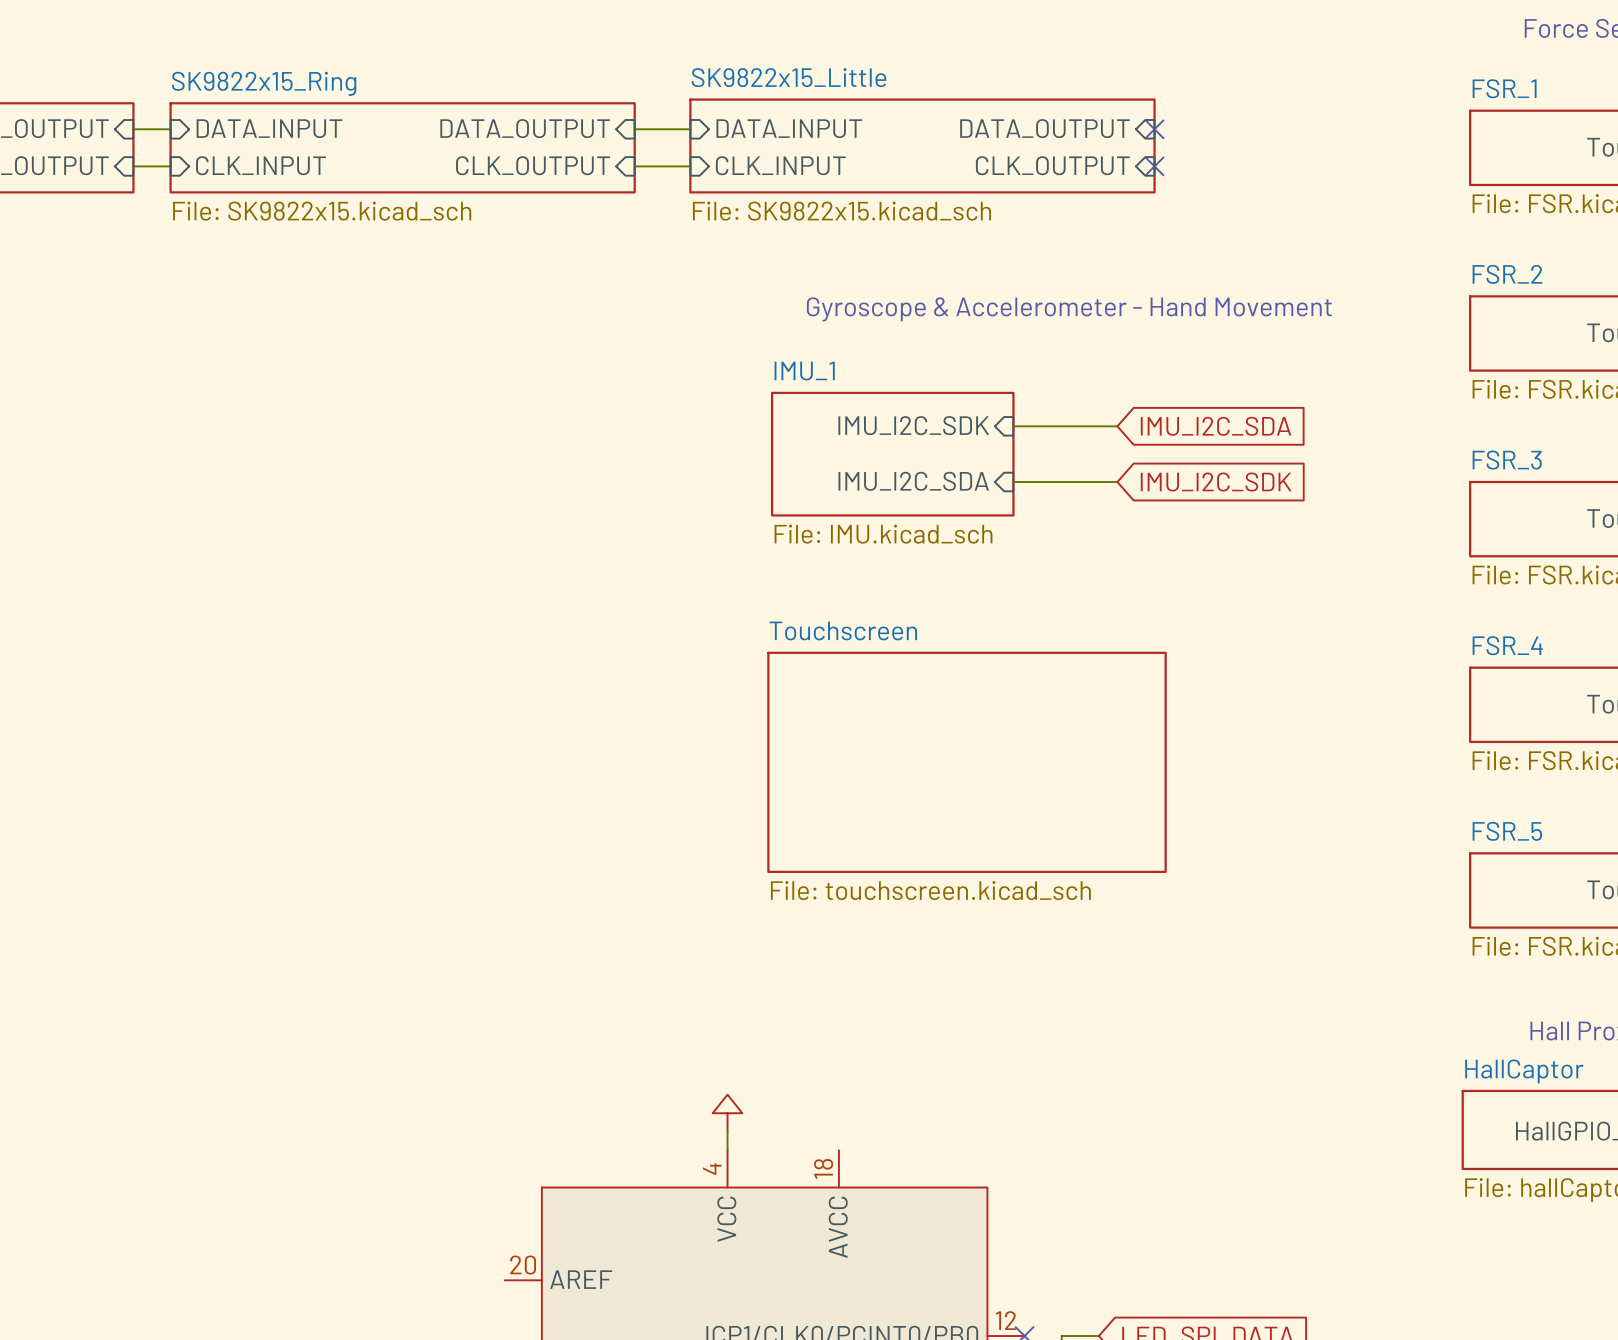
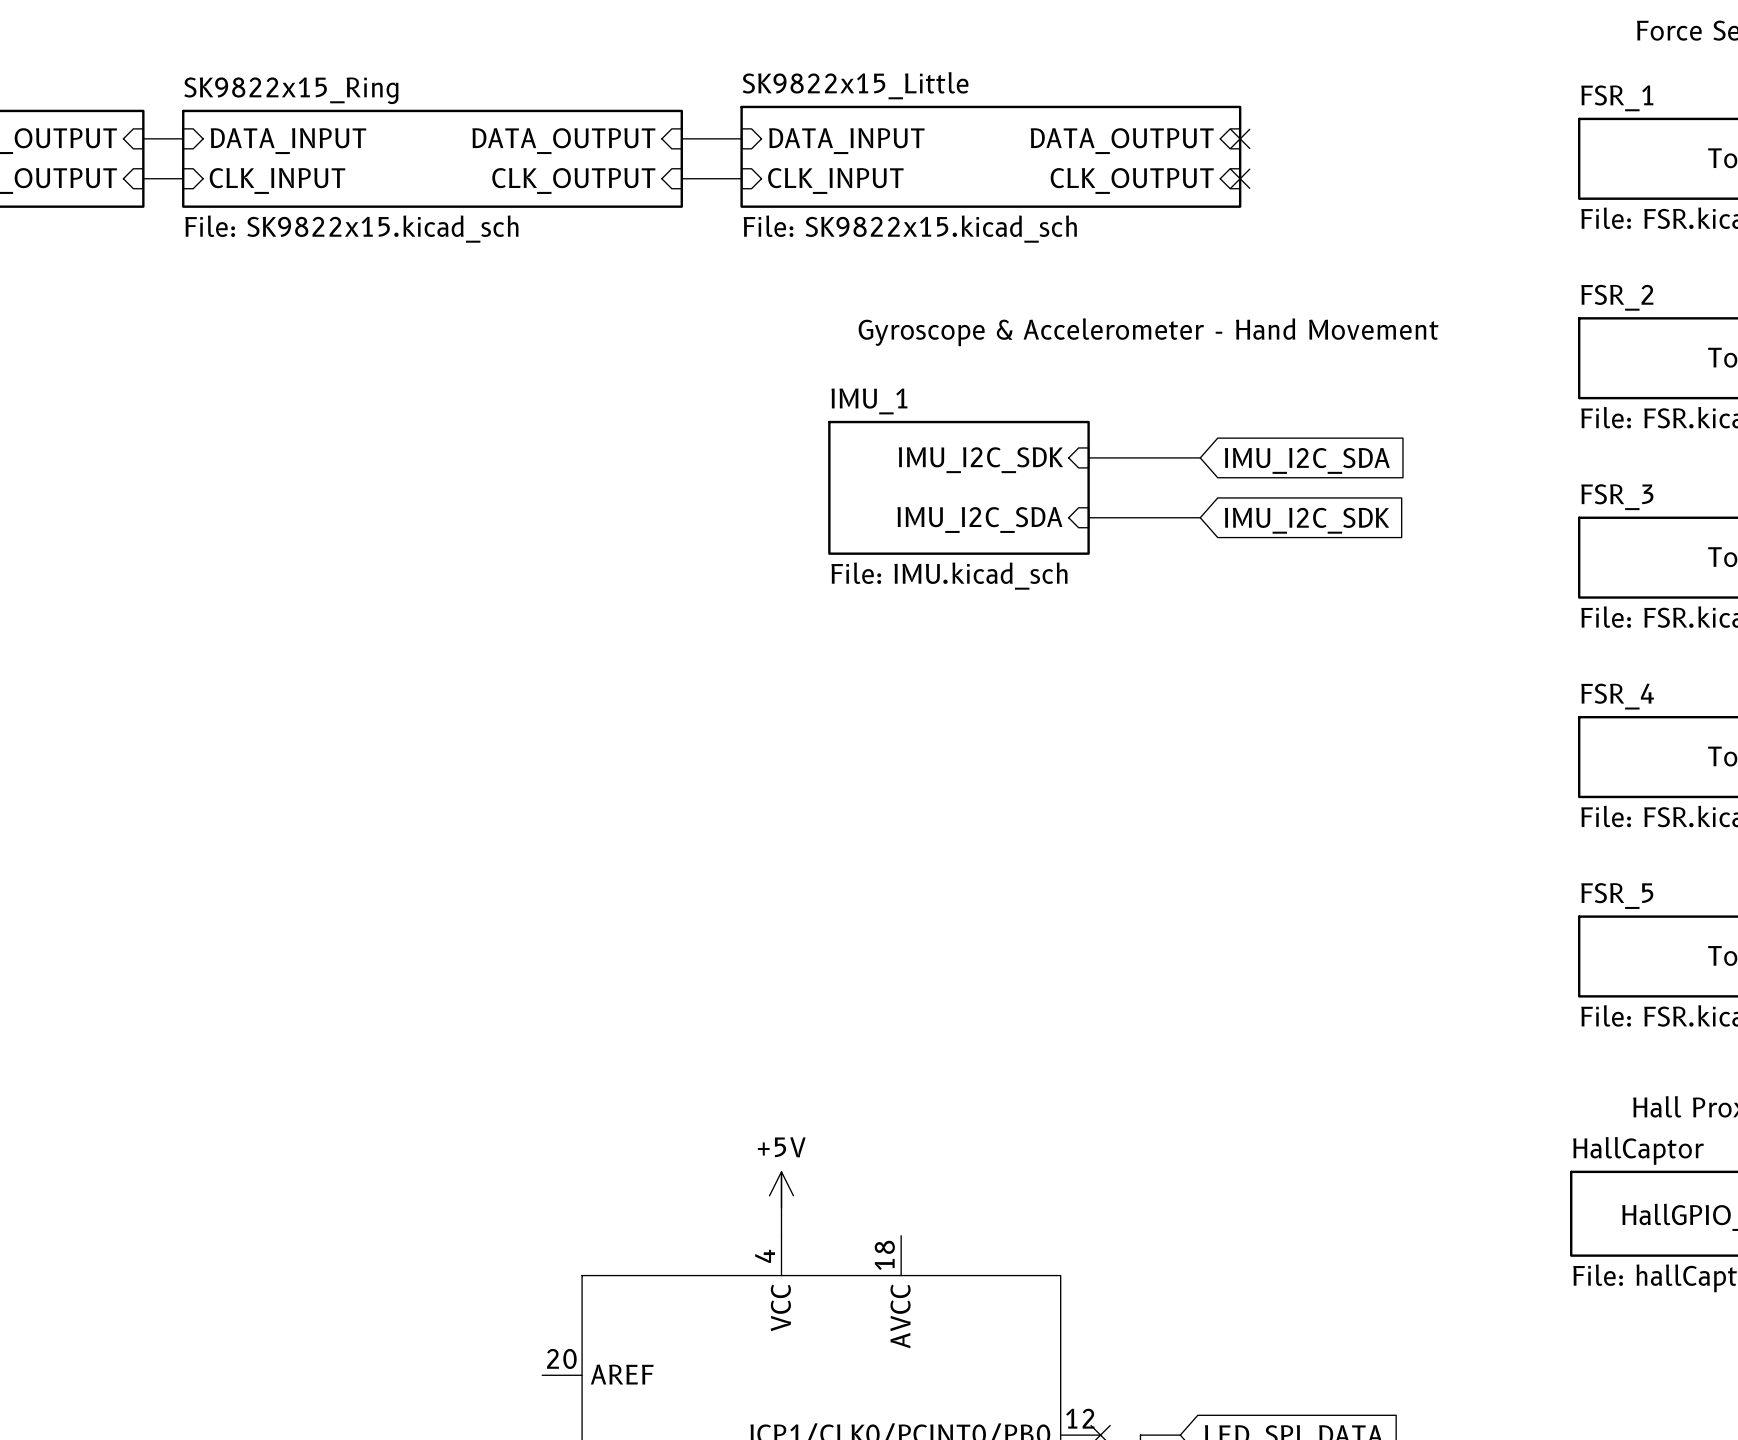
sheet Touchscreen: File: touchscreen.kicad_sch (967, 762) -> none
power symbol text: none -> +5V (781, 1147)
power symbol shape: [712, 1094, 743, 1132] -> [769, 1171, 794, 1216]

